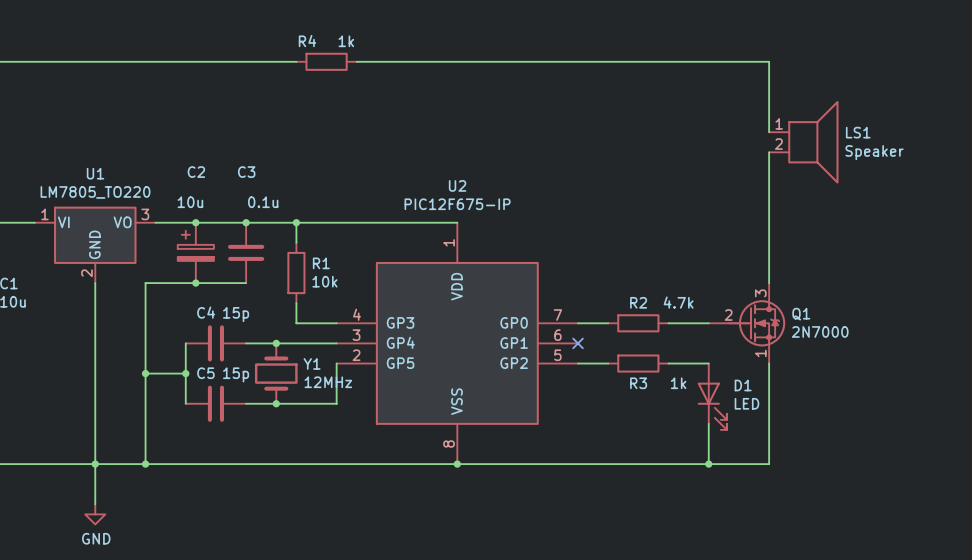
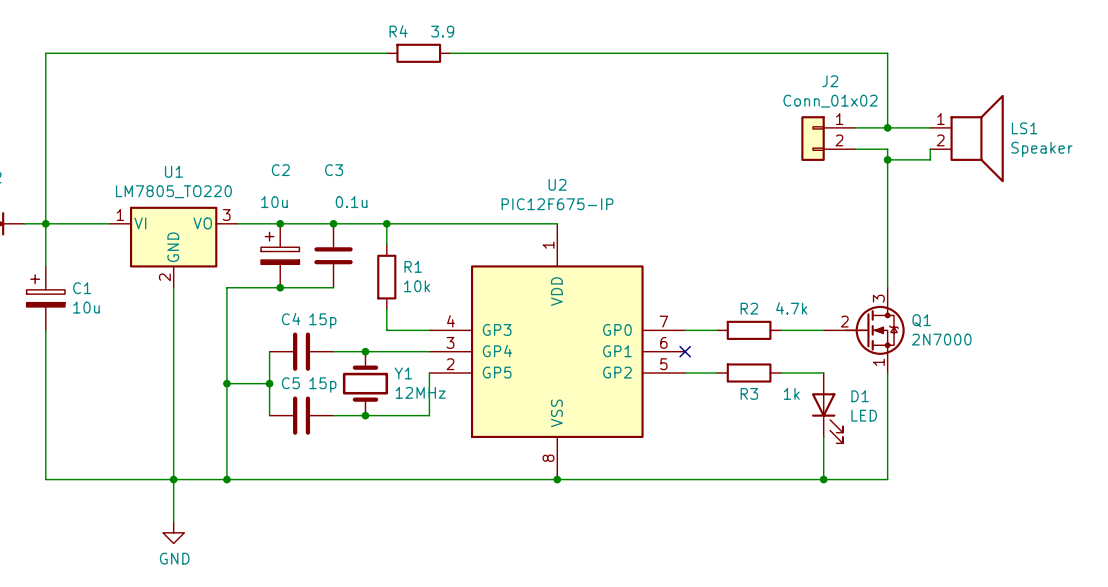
R4 value: 1k (346, 41) -> 3.9 (442, 31)
wire: none -> (855, 127) (930, 127)
junction: none -> (887, 127)
J2: none -> Conn_01x02 (828, 138)
LS1 position: (803, 142) -> (967, 138)
wire: none -> (855, 149) (887, 149)
wire: none -> (930, 149) (930, 159) (887, 159)
junction: none -> (887, 159)

